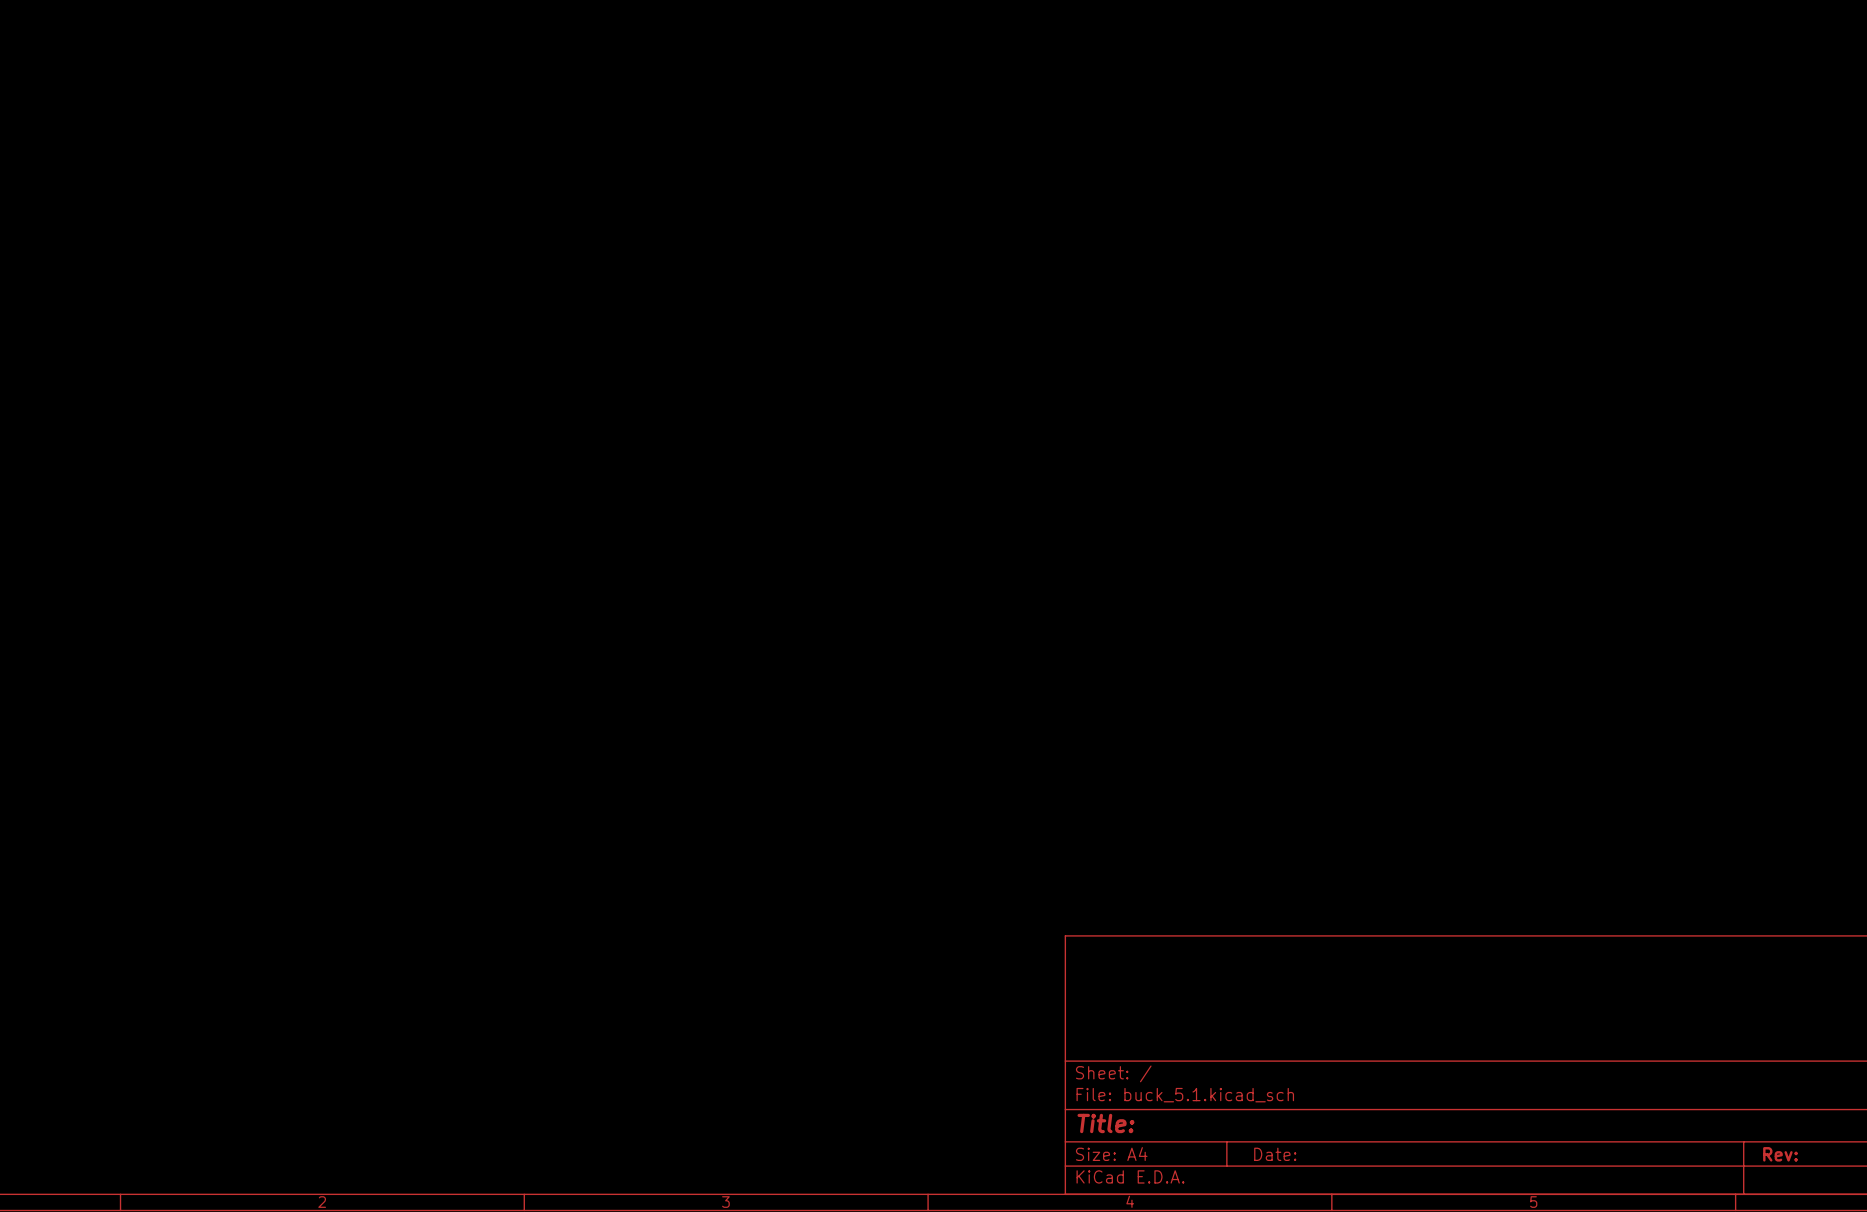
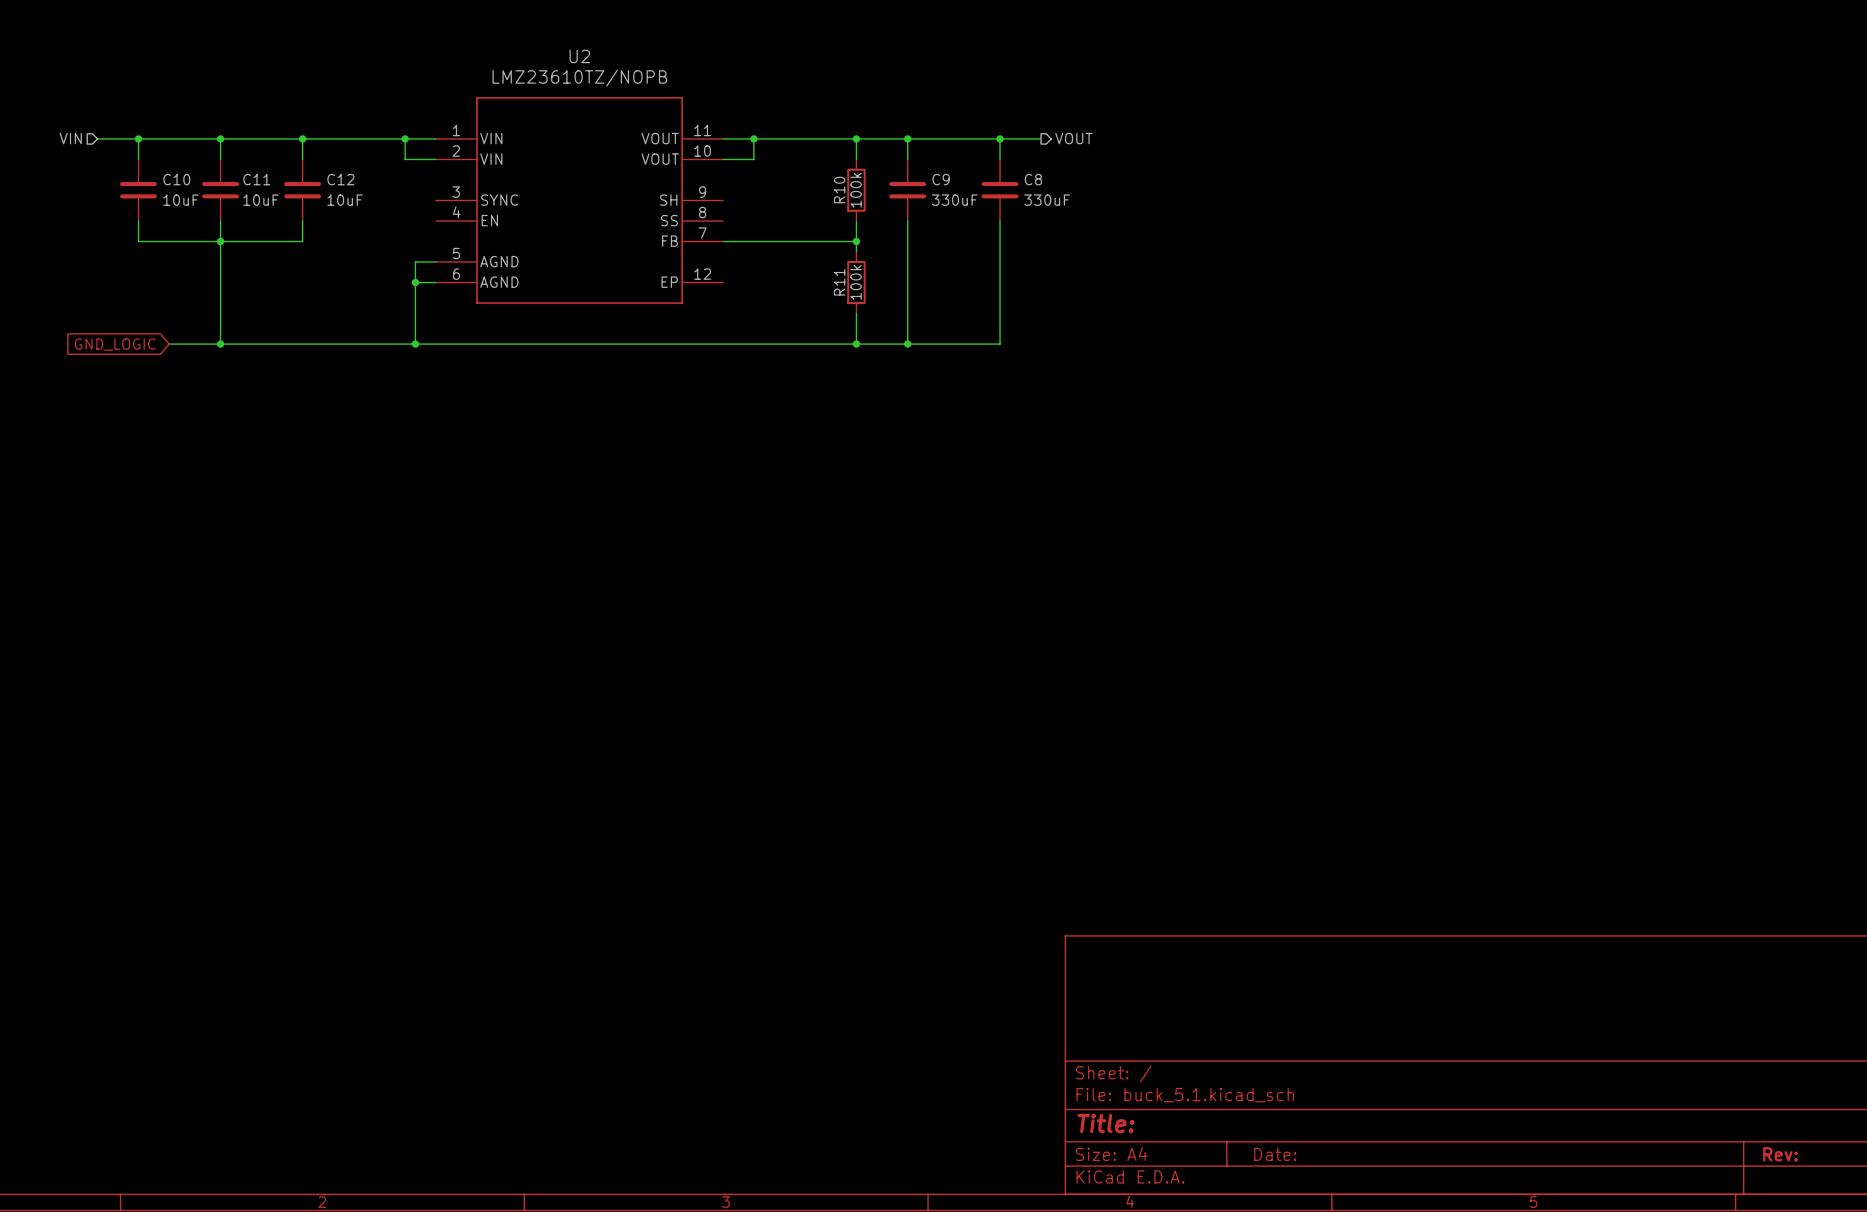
hierarchical label: none -> VIN (70, 138)
wire: none -> (97, 138) (435, 138)
wire: none -> (138, 138) (138, 159)
junction: none -> (138, 138)
wire: none -> (220, 138) (220, 159)
junction: none -> (220, 138)
wire: none -> (302, 138) (302, 159)
junction: none -> (302, 138)
wire: none -> (405, 138) (405, 159) (435, 159)
junction: none -> (405, 138)
wire: none -> (723, 138) (1041, 138)
wire: none -> (753, 138) (753, 159) (723, 159)
junction: none -> (753, 138)
wire: none -> (856, 138) (856, 159)
junction: none -> (856, 138)
wire: none -> (907, 138) (907, 159)
junction: none -> (907, 138)
wire: none -> (1000, 138) (1000, 159)
junction: none -> (1000, 138)
hierarchical label: none -> VOUT (1073, 138)
C10: none -> 10uF (138, 190)
C11: none -> 10uF (220, 190)
C12: none -> 10uF (302, 190)
R10: none -> 100k (856, 190)
C9: none -> 330uF (907, 190)
C8: none -> 330uF (1000, 190)
U2: none -> LMZ23610TZ/NOPB (579, 200)
wire: none -> (138, 221) (138, 241) (302, 241) (302, 221)
wire: none -> (220, 221) (220, 344)
wire: none -> (856, 221) (856, 251)
wire: none -> (907, 221) (907, 344)
wire: none -> (1000, 221) (1000, 344) (169, 344)
junction: none -> (220, 241)
wire: none -> (723, 241) (856, 241)
junction: none -> (856, 241)
wire: none -> (435, 262) (415, 262) (415, 344)
wire: none -> (415, 282) (435, 282)
junction: none -> (415, 282)
R11: none -> 100k (856, 282)
wire: none -> (856, 313) (856, 344)
global label: none -> GND_LOGIC (115, 344)
junction: none -> (220, 344)
junction: none -> (415, 344)
junction: none -> (856, 344)
junction: none -> (907, 344)

